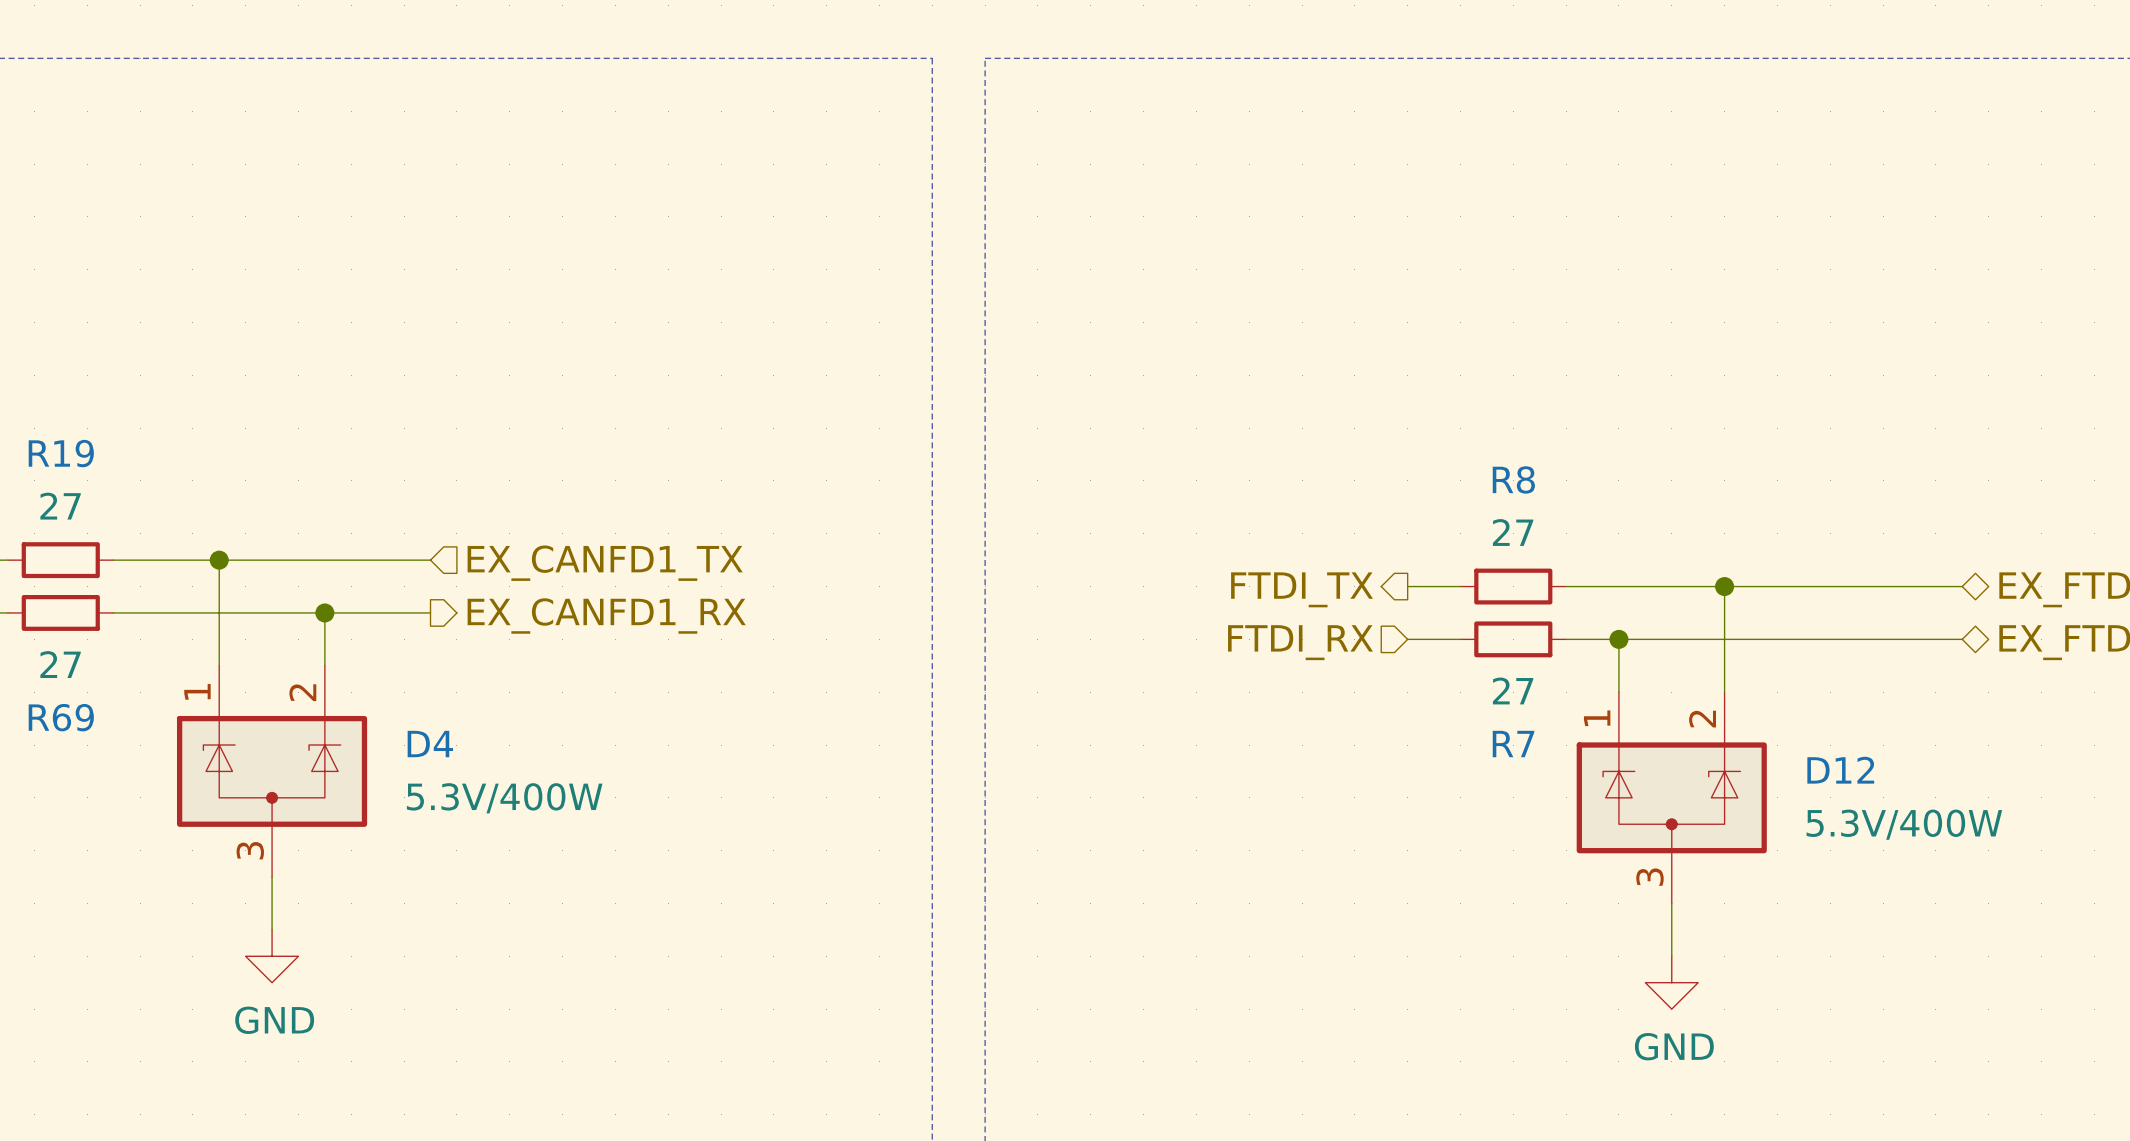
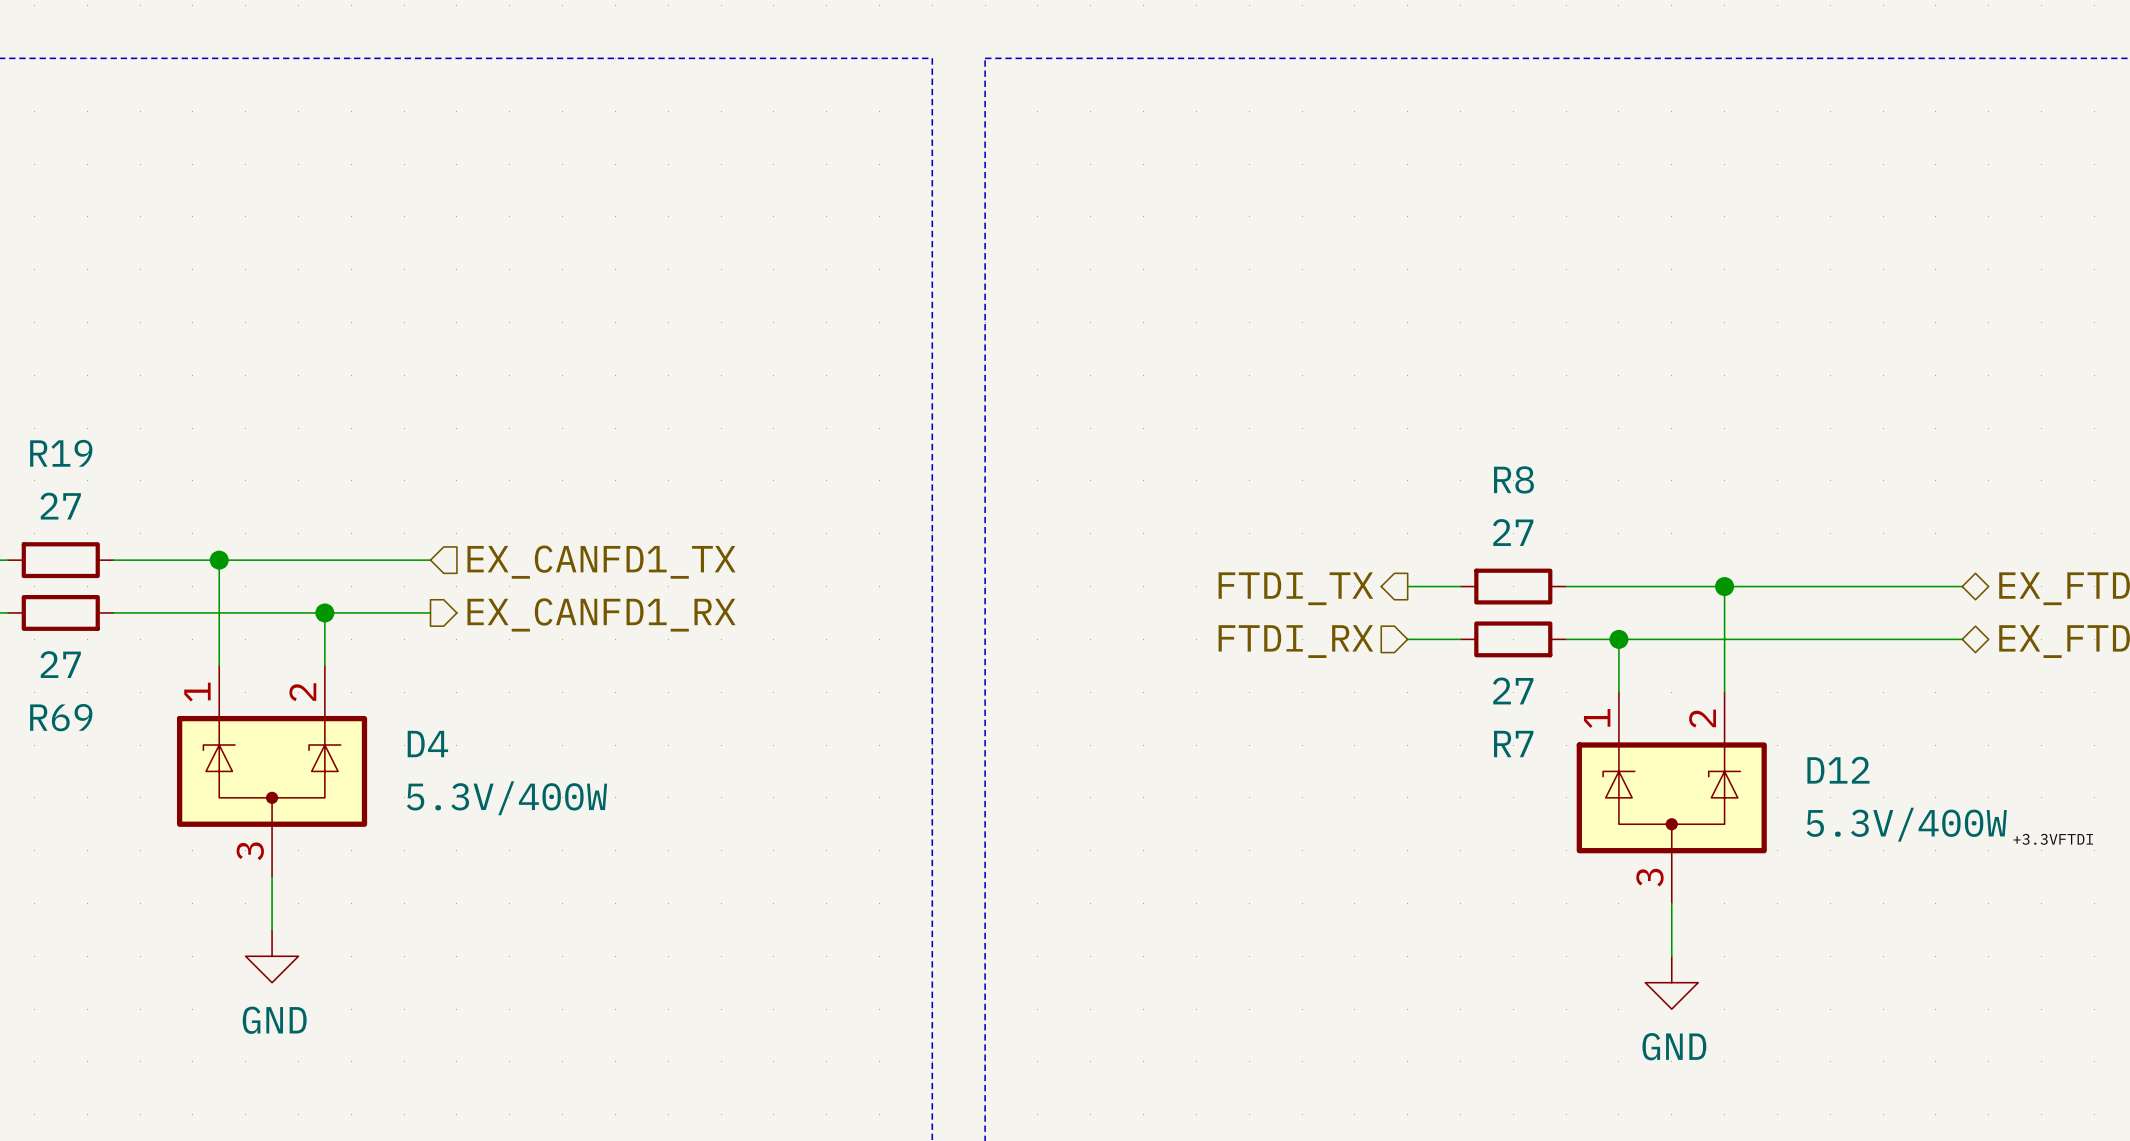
label: none -> +3.3VFTDI (2053, 839)

